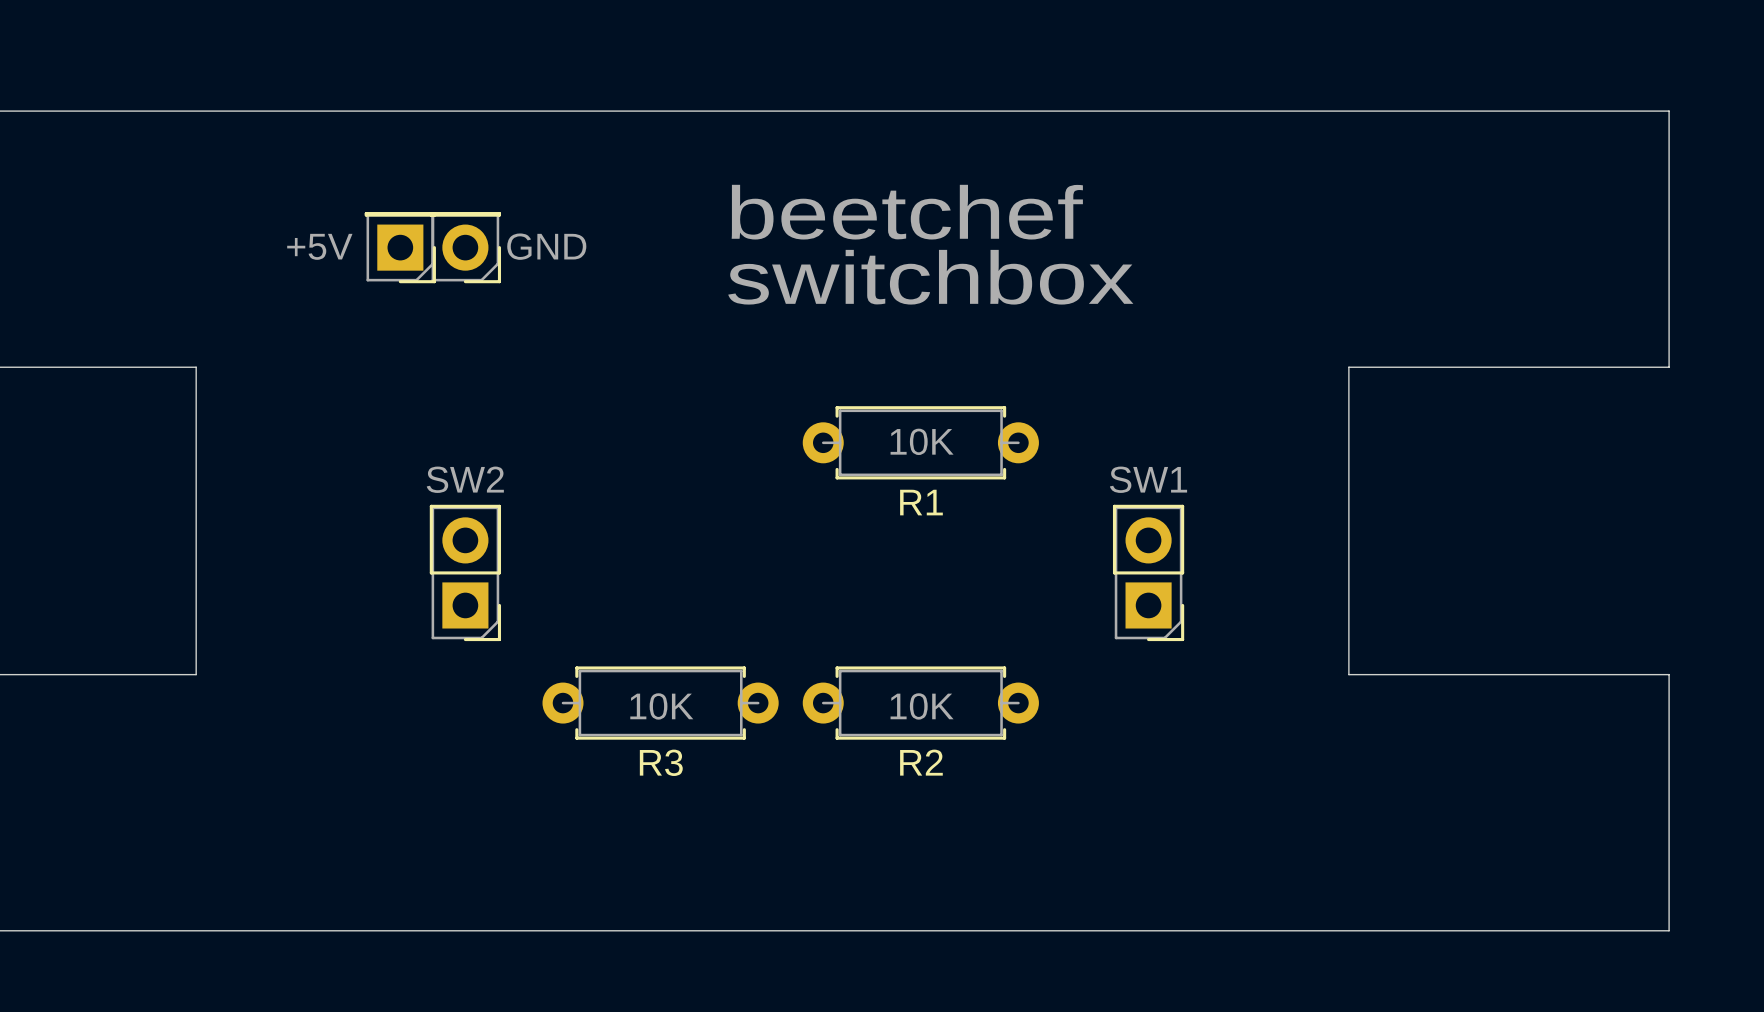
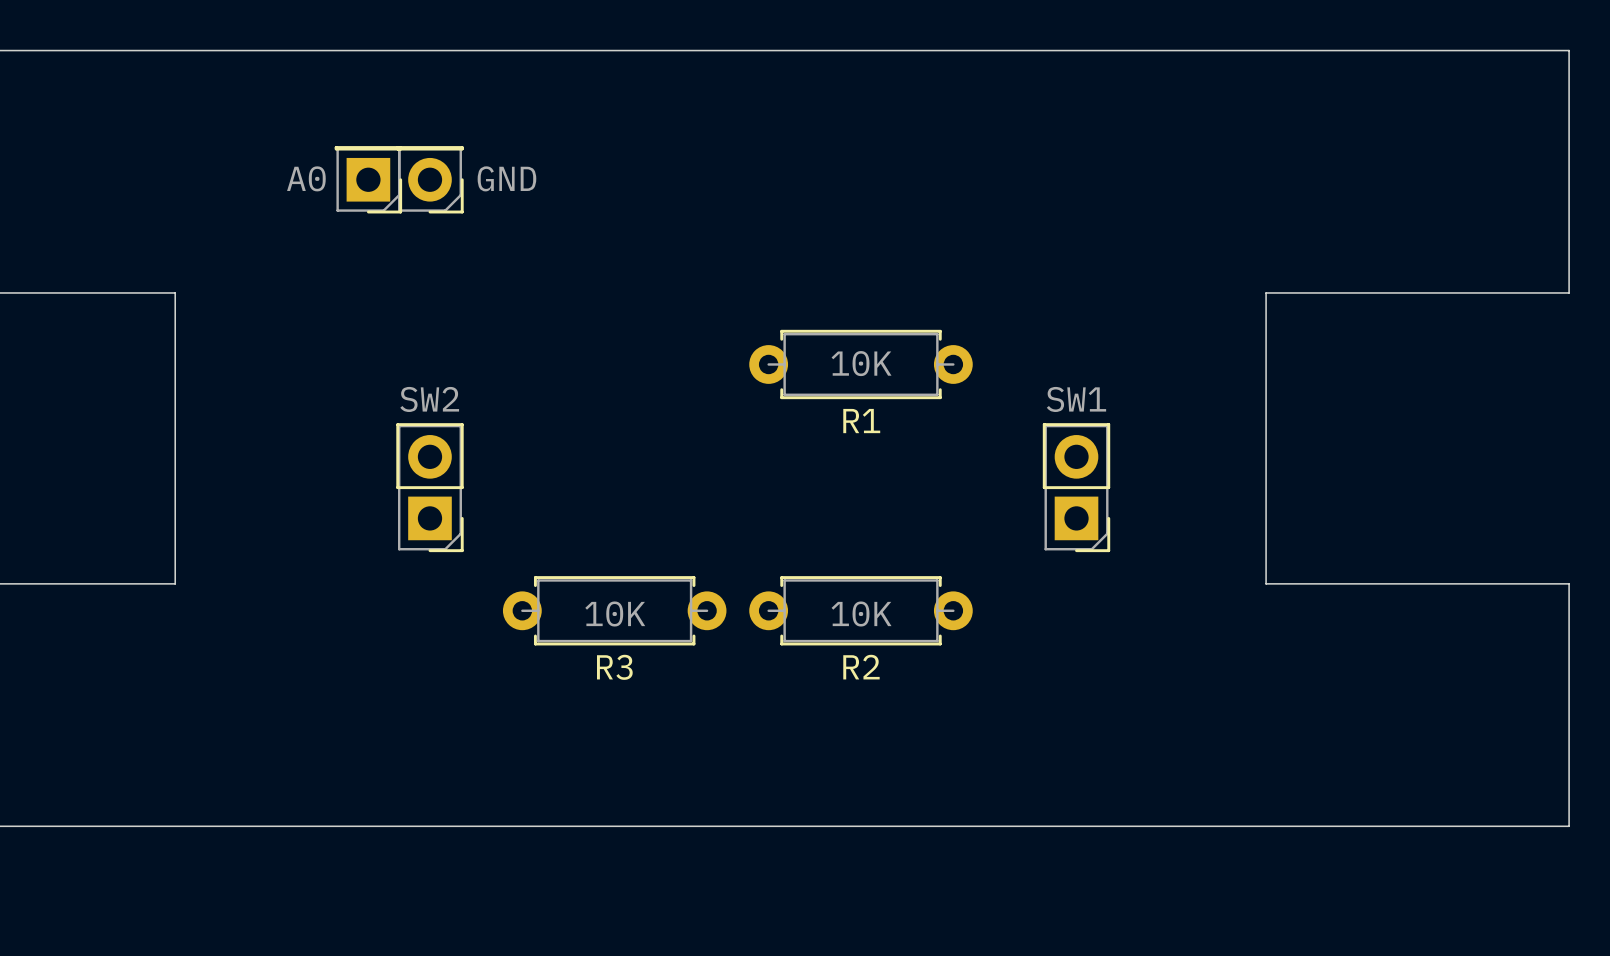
text: beetchef (907, 212) -> none
part value: +5V (319, 246) -> A0 (306, 178)
text: switchbox (930, 277) -> none

